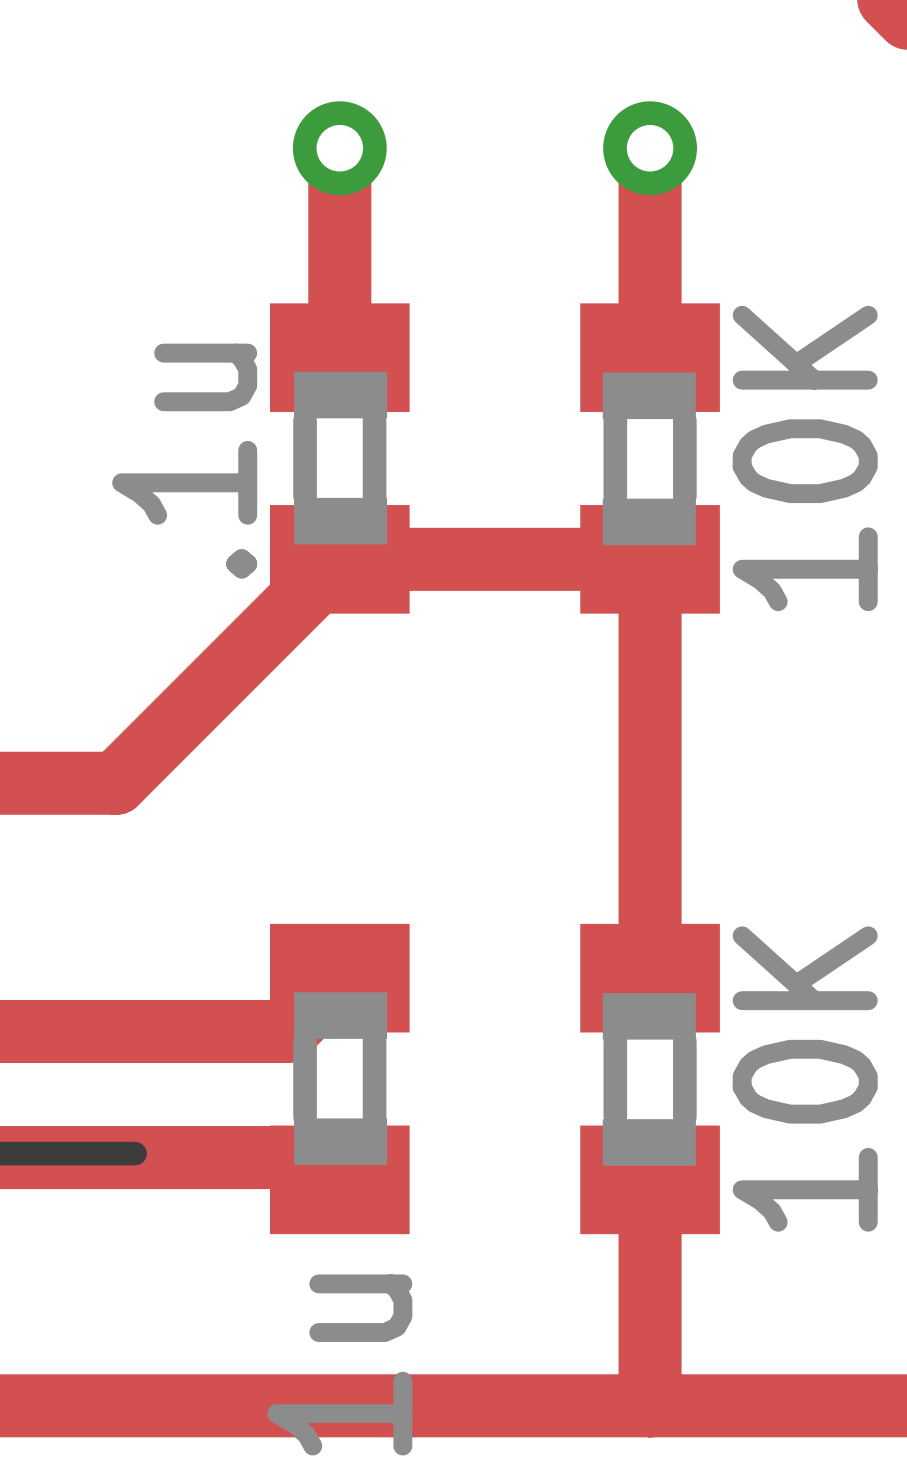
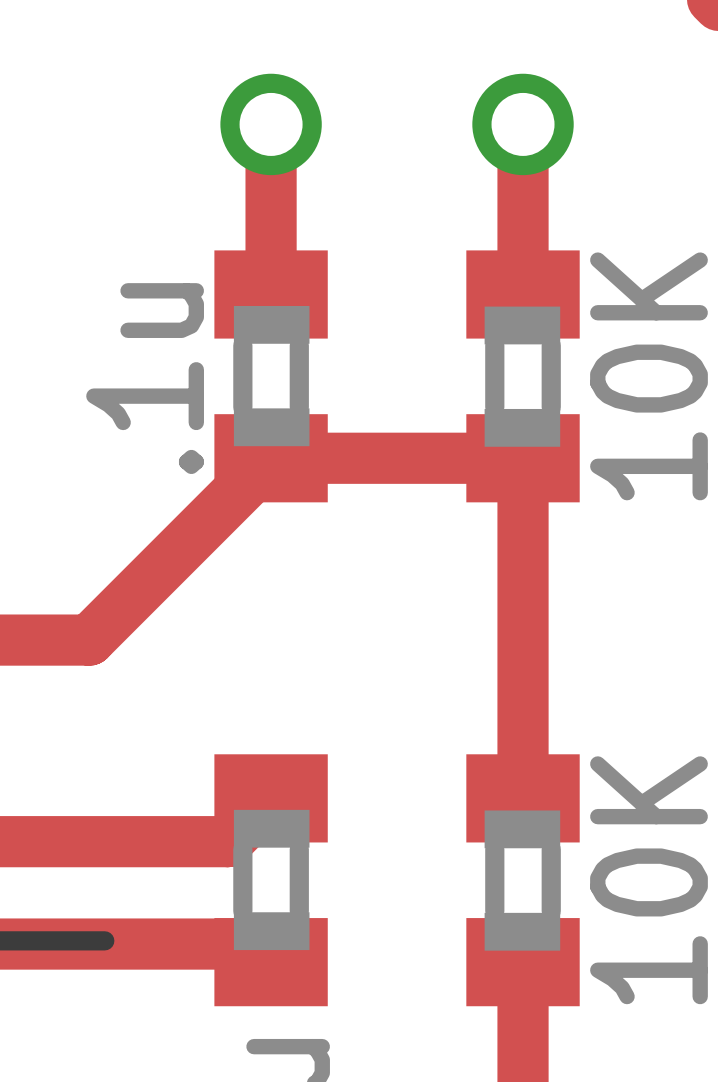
via size: [292, 101, 387, 196] -> [220, 73, 322, 176]
via size: [603, 101, 697, 196] -> [472, 73, 574, 176]

